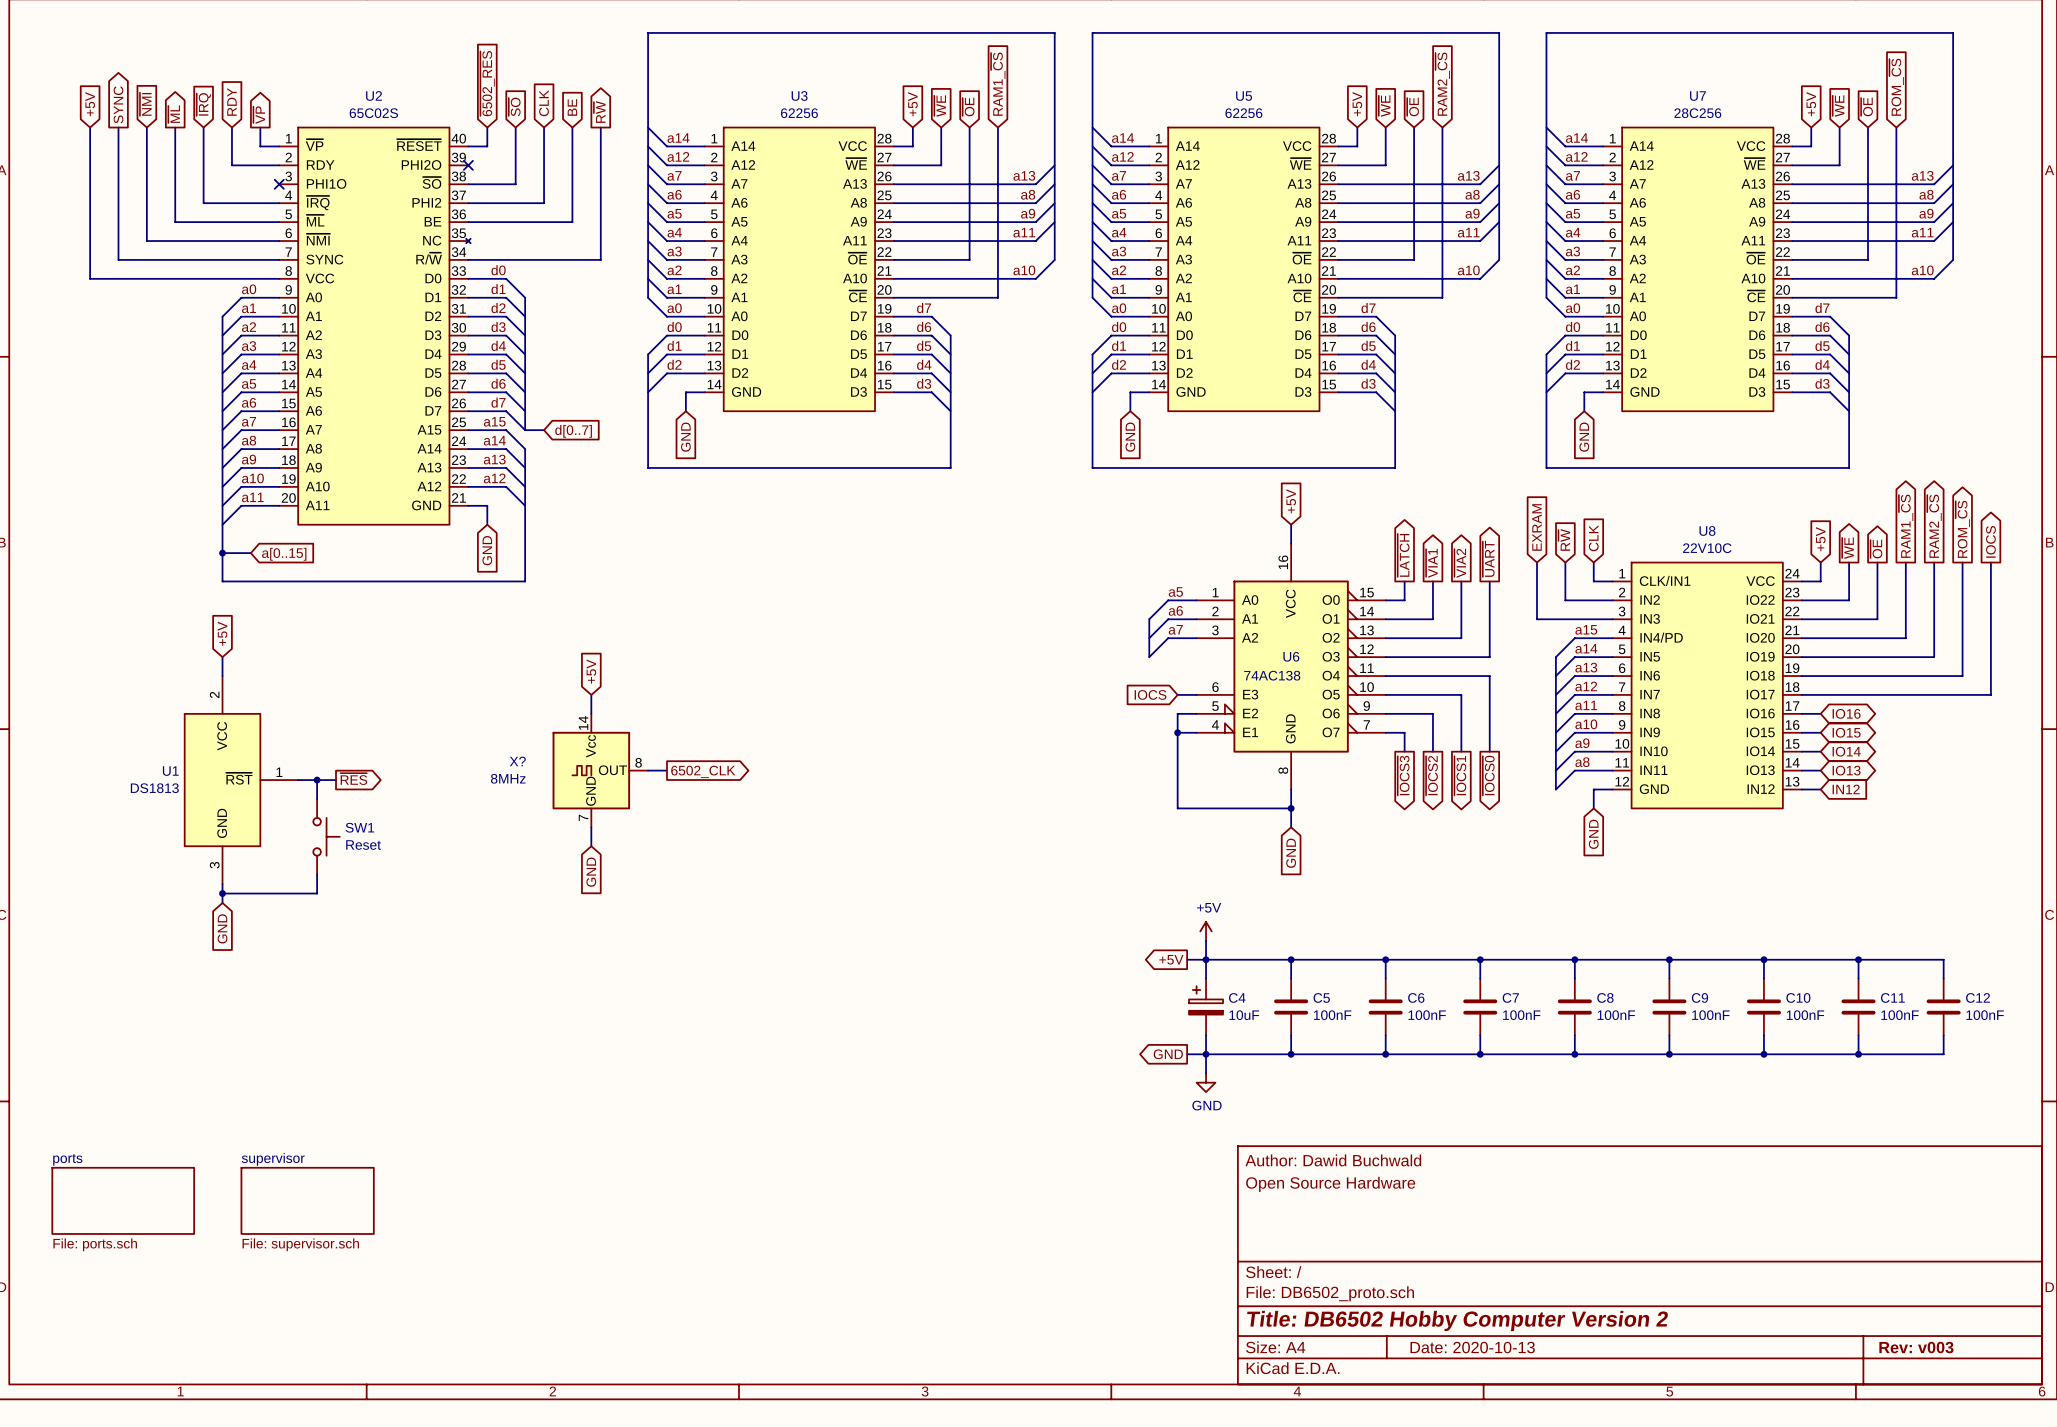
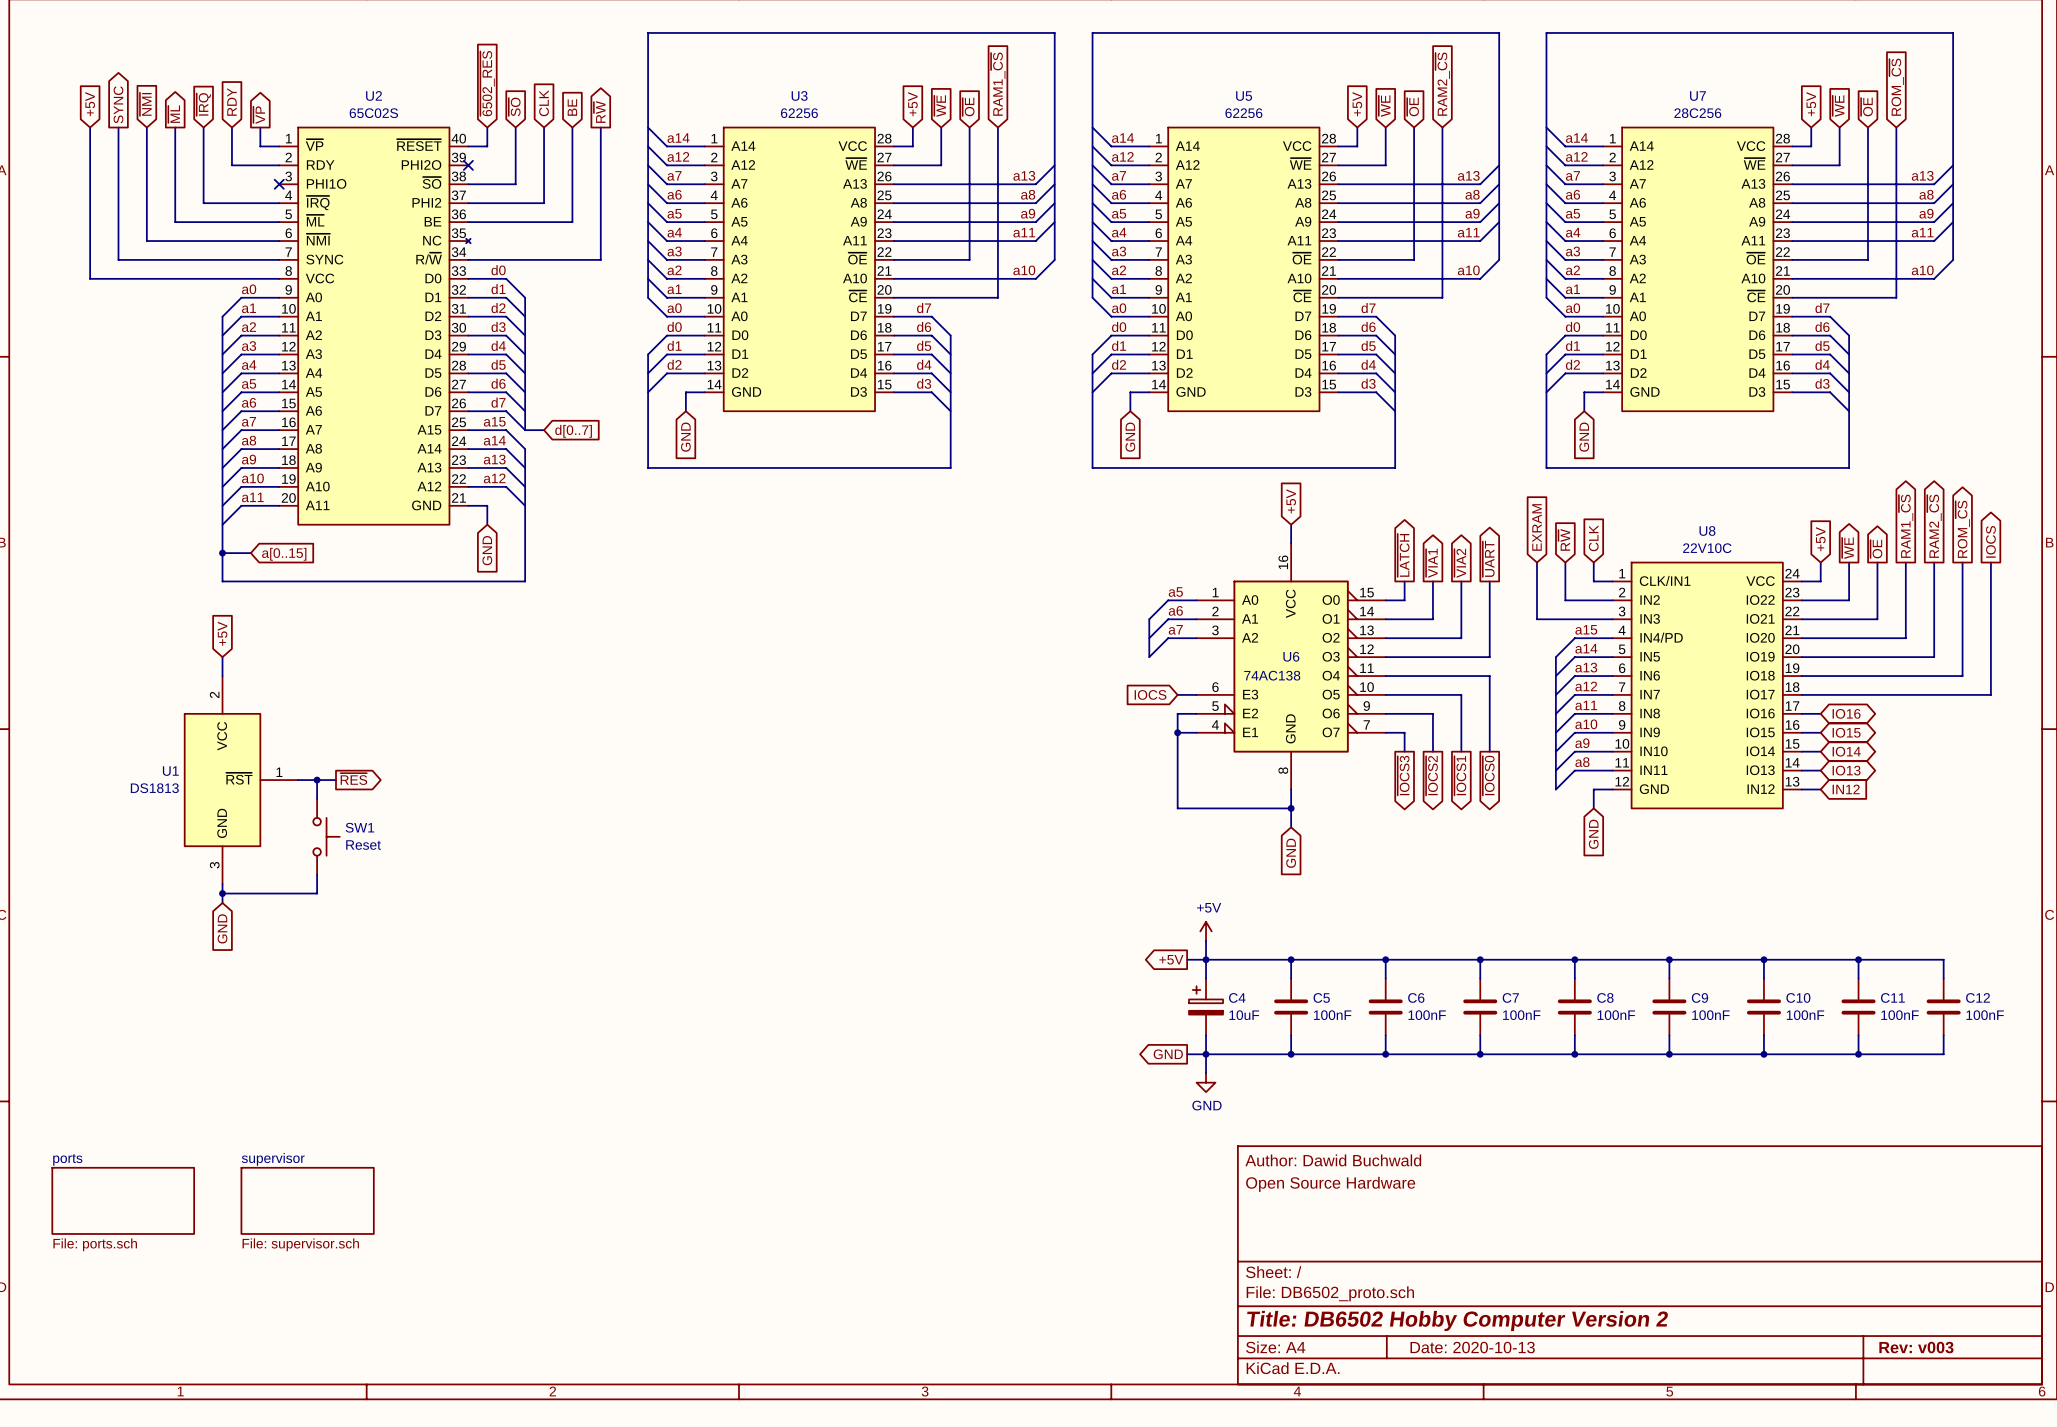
global label: +5V (591, 671) -> none
wire: (591, 694) (591, 713) -> none
X?: 8MHz (600, 770) -> none
wire: (648, 770) (666, 770) -> none
global label: 6502_CLK (703, 771) -> none
wire: (591, 827) (591, 846) -> none
global label: GND (591, 872) -> none

